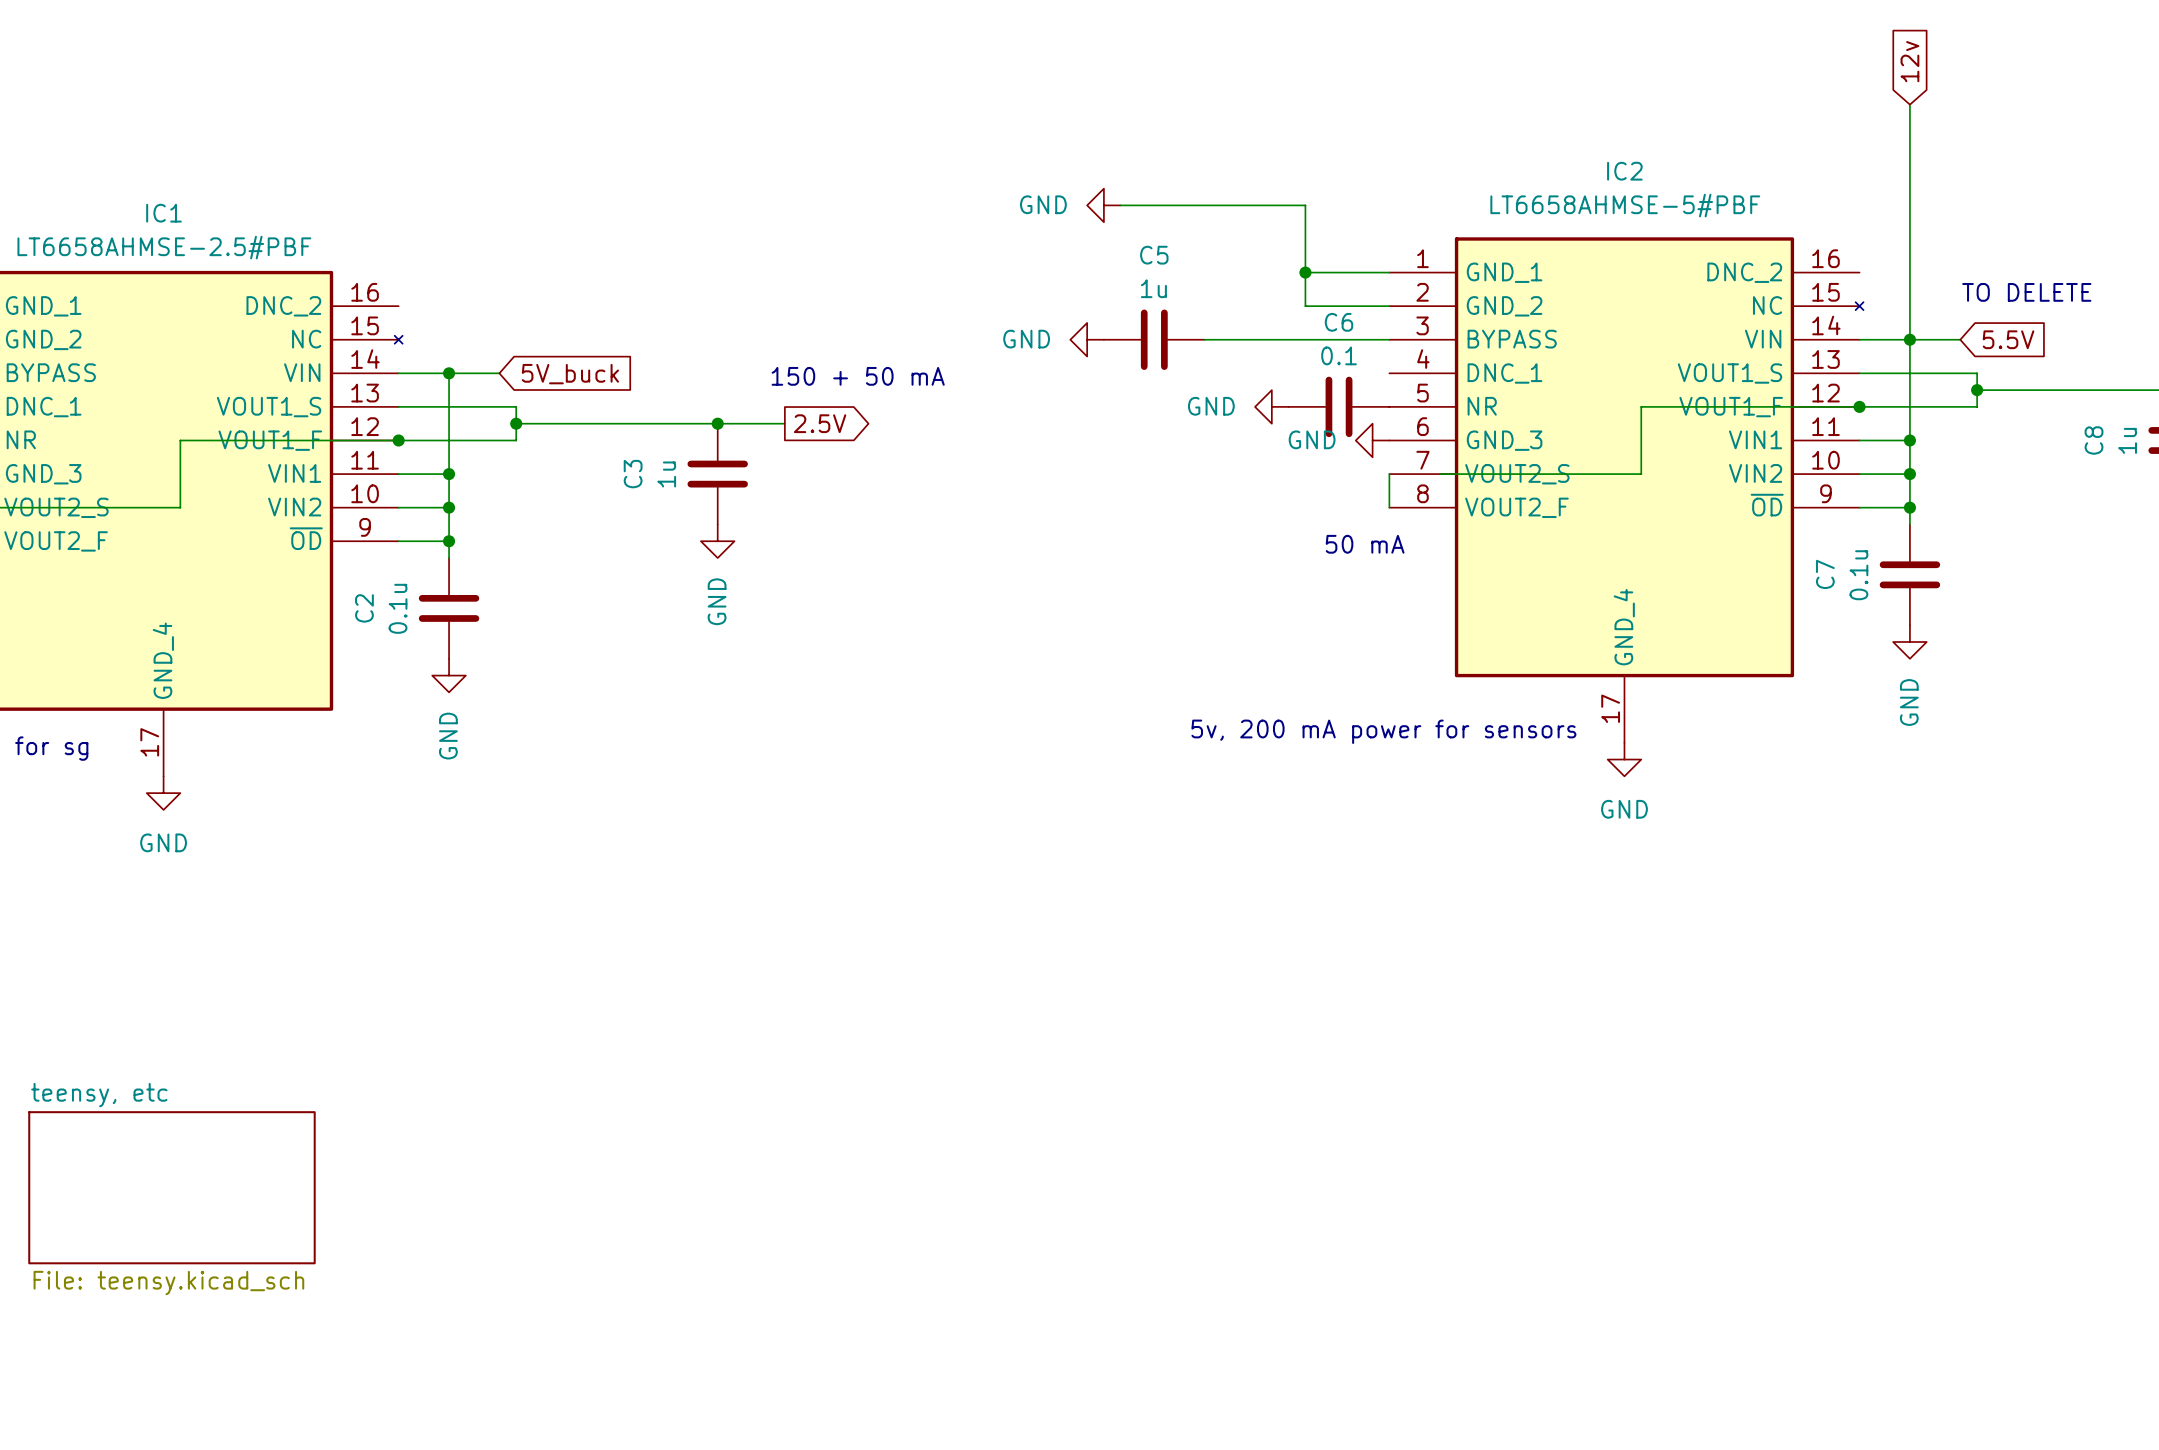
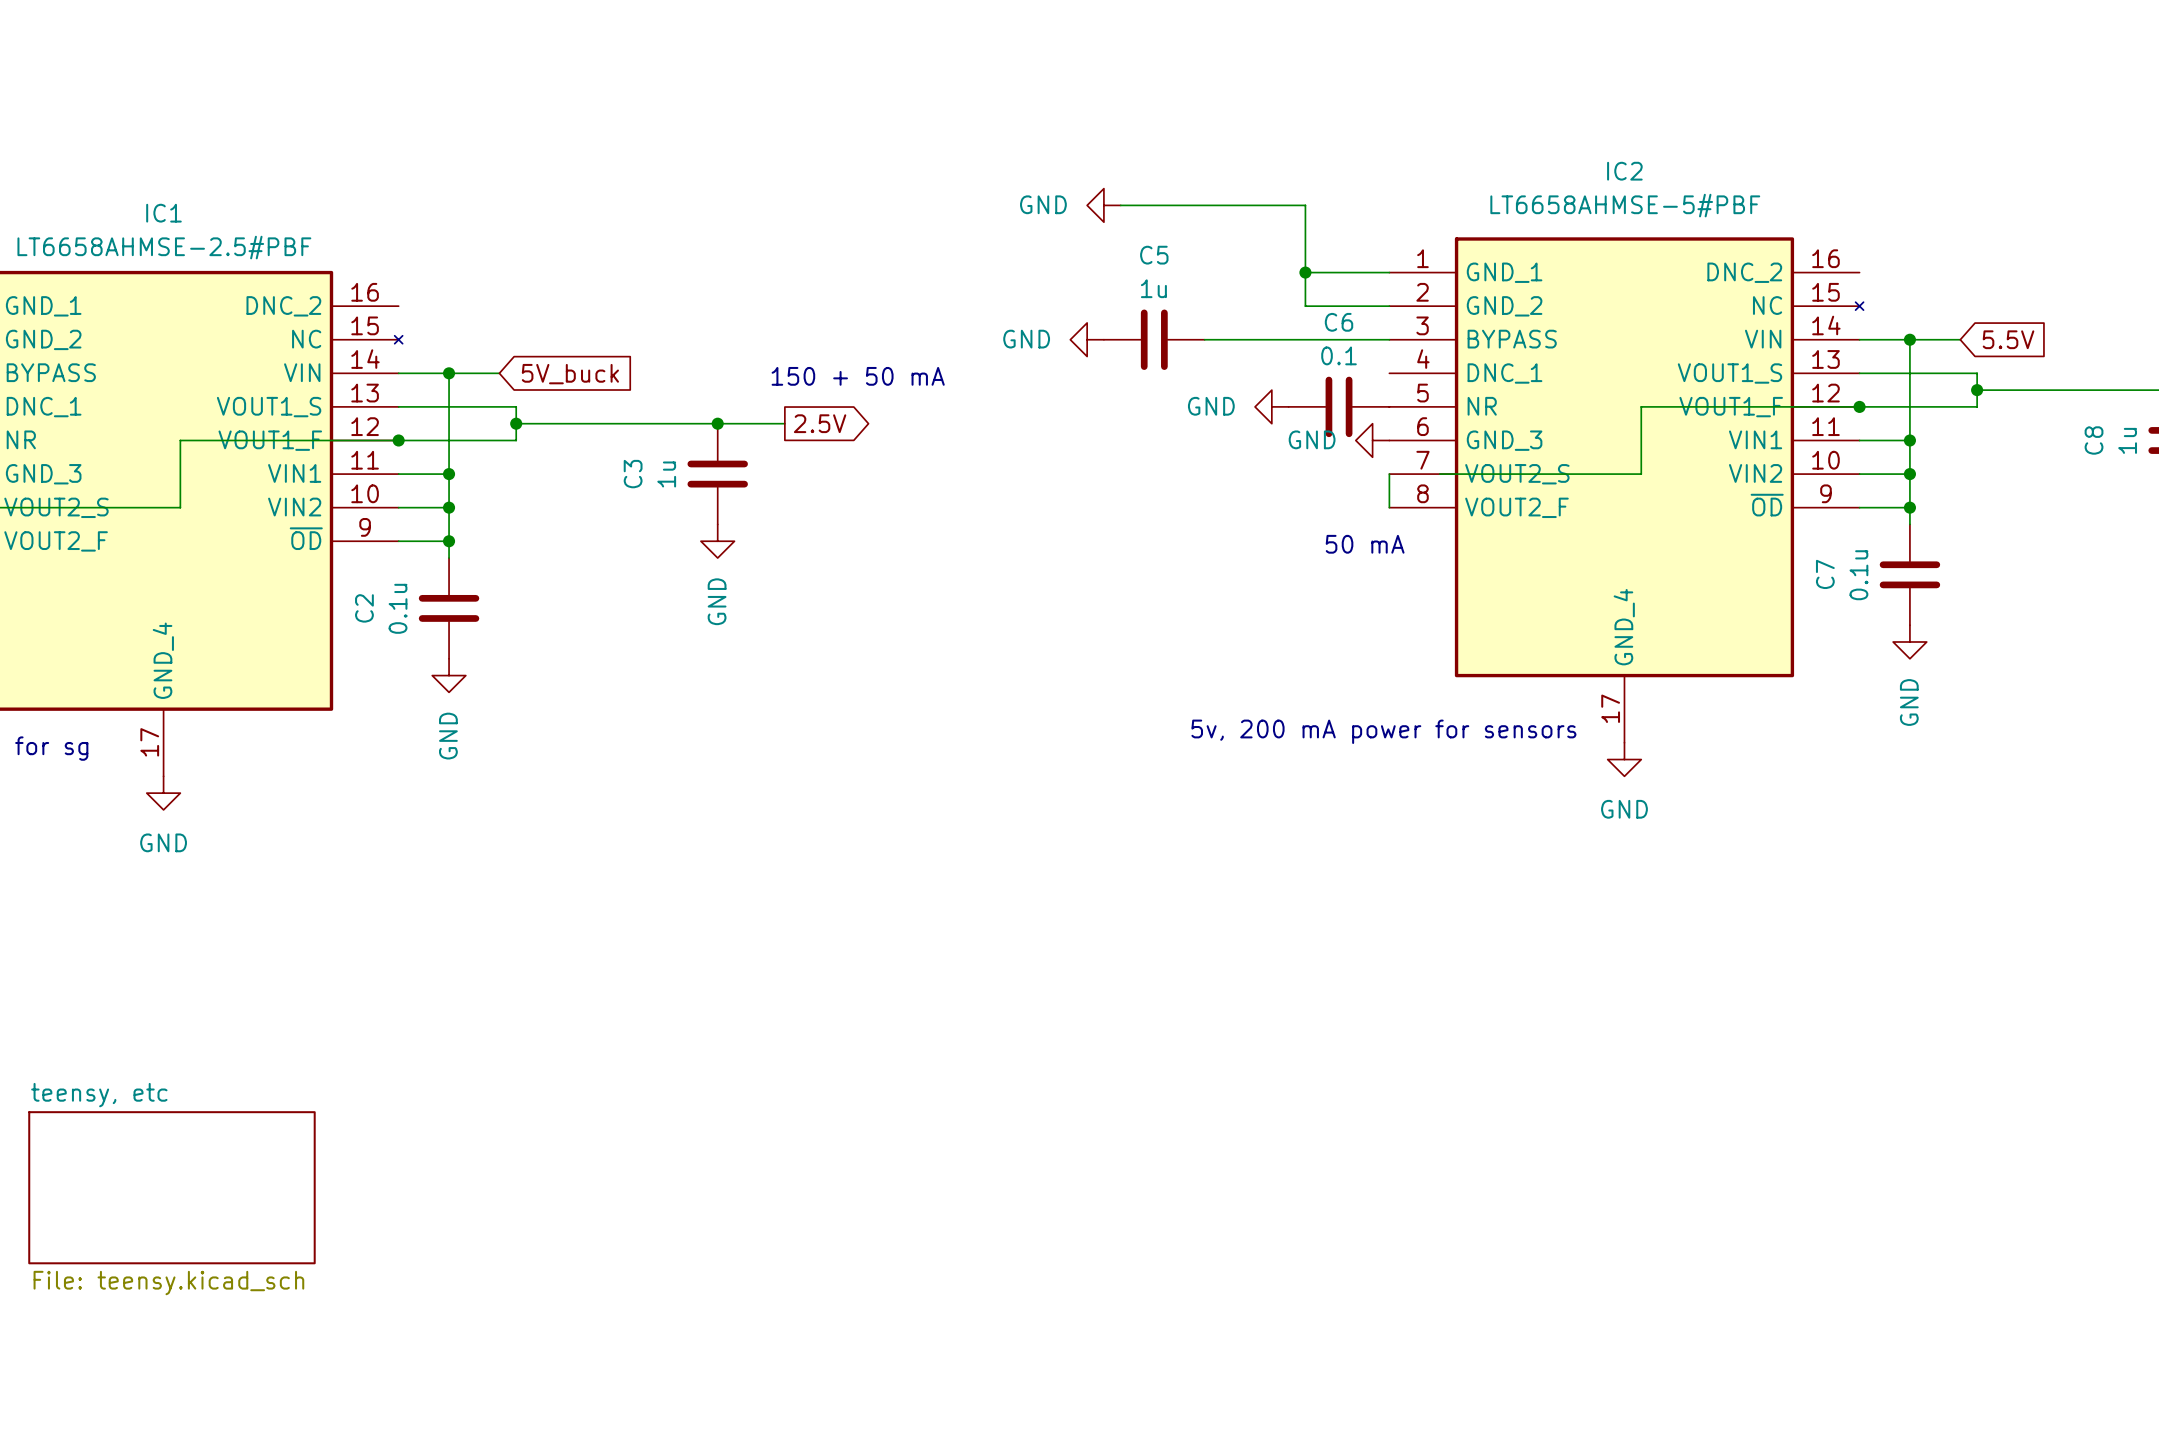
global label: 12v (1909, 61) -> none
wire: (1909, 104) (1909, 339) -> none
text: TO DELETE (2026, 292) -> none

